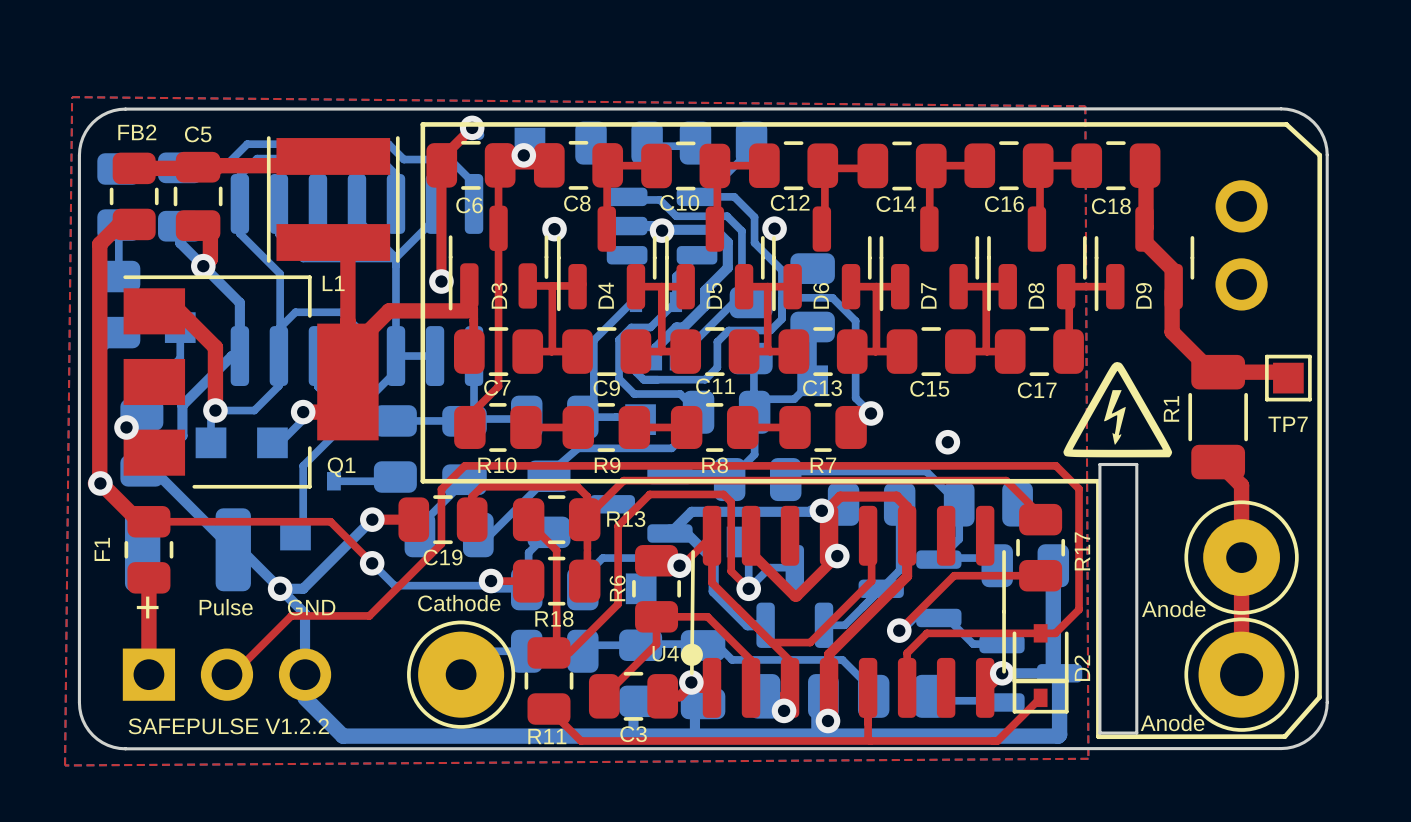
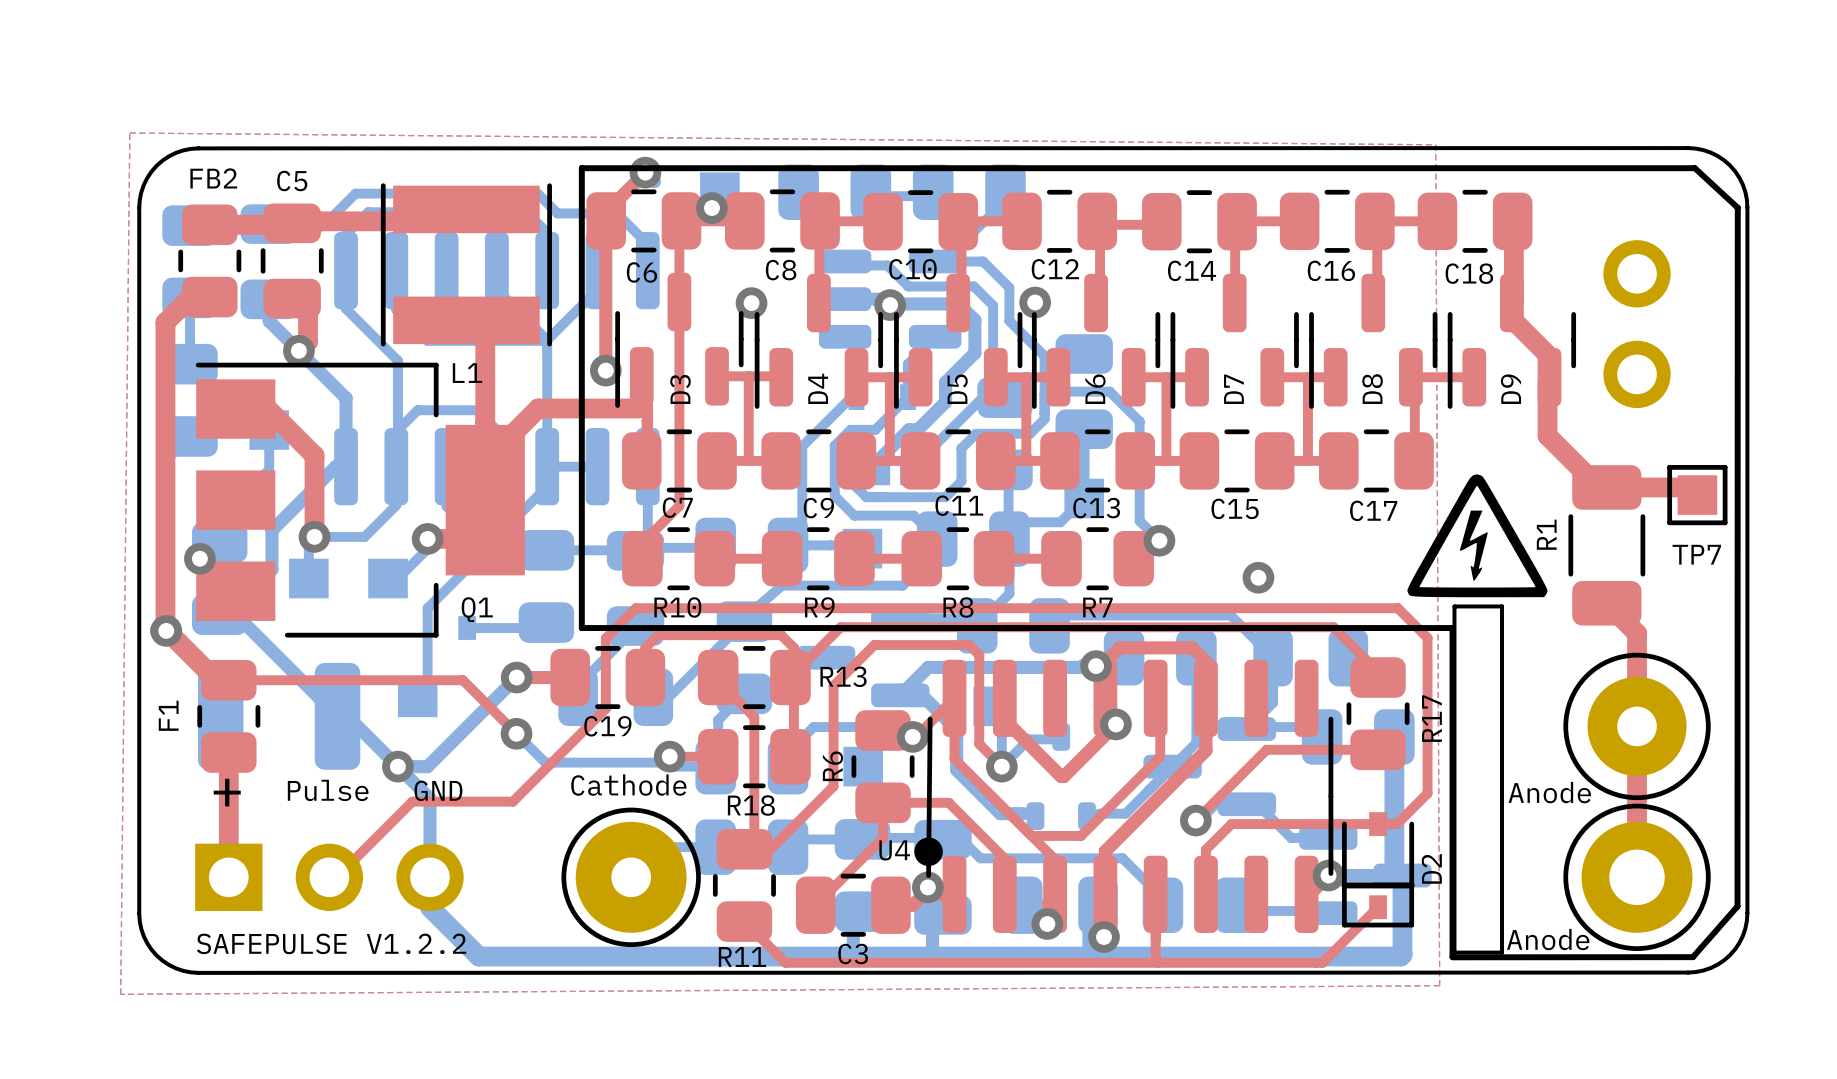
part footprint: [756, 545, 834, 648] -> [1026, 723, 1096, 831]

